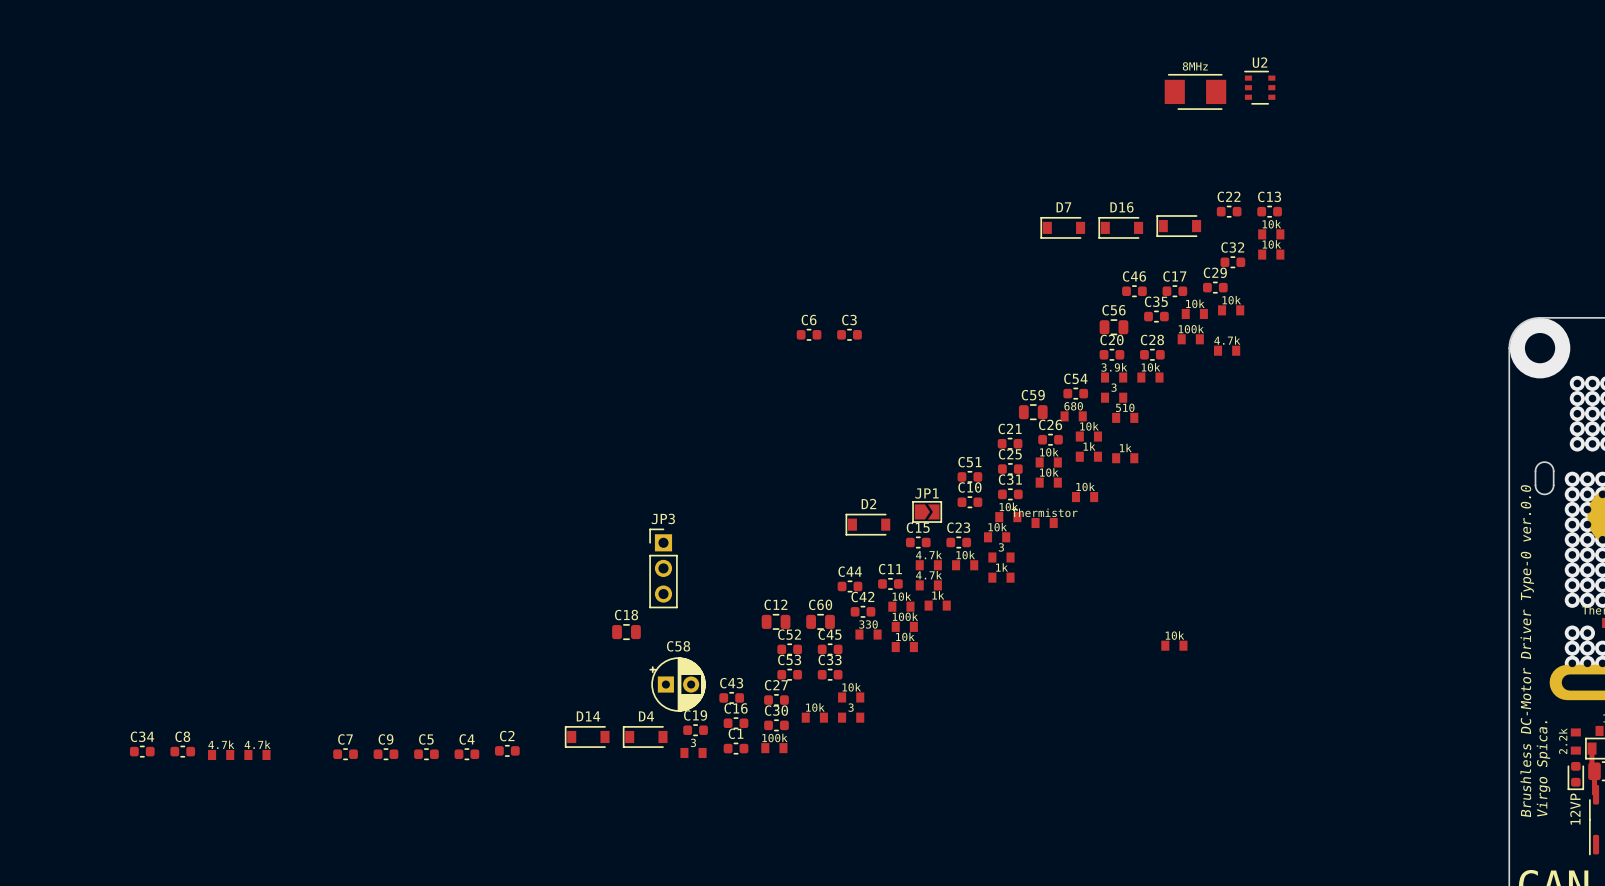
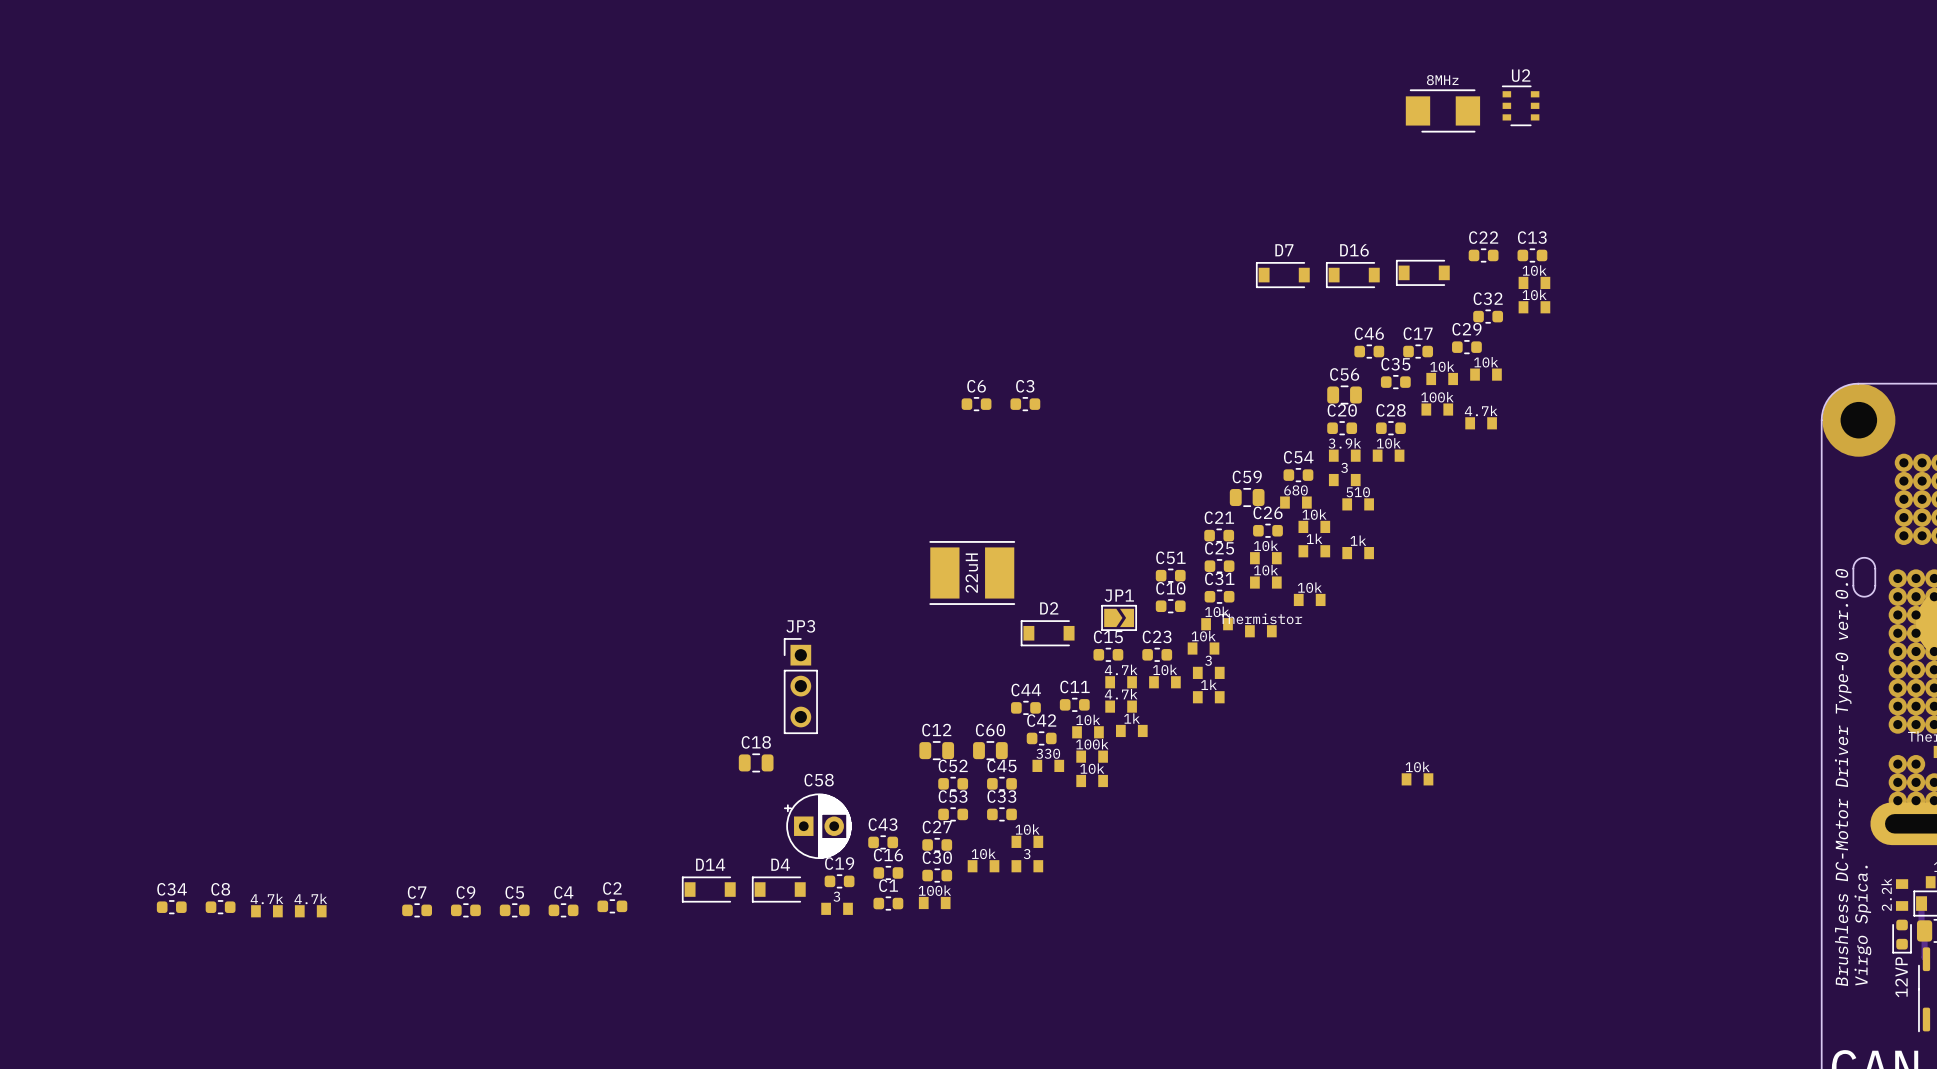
part: none -> 22uH (972, 572)

